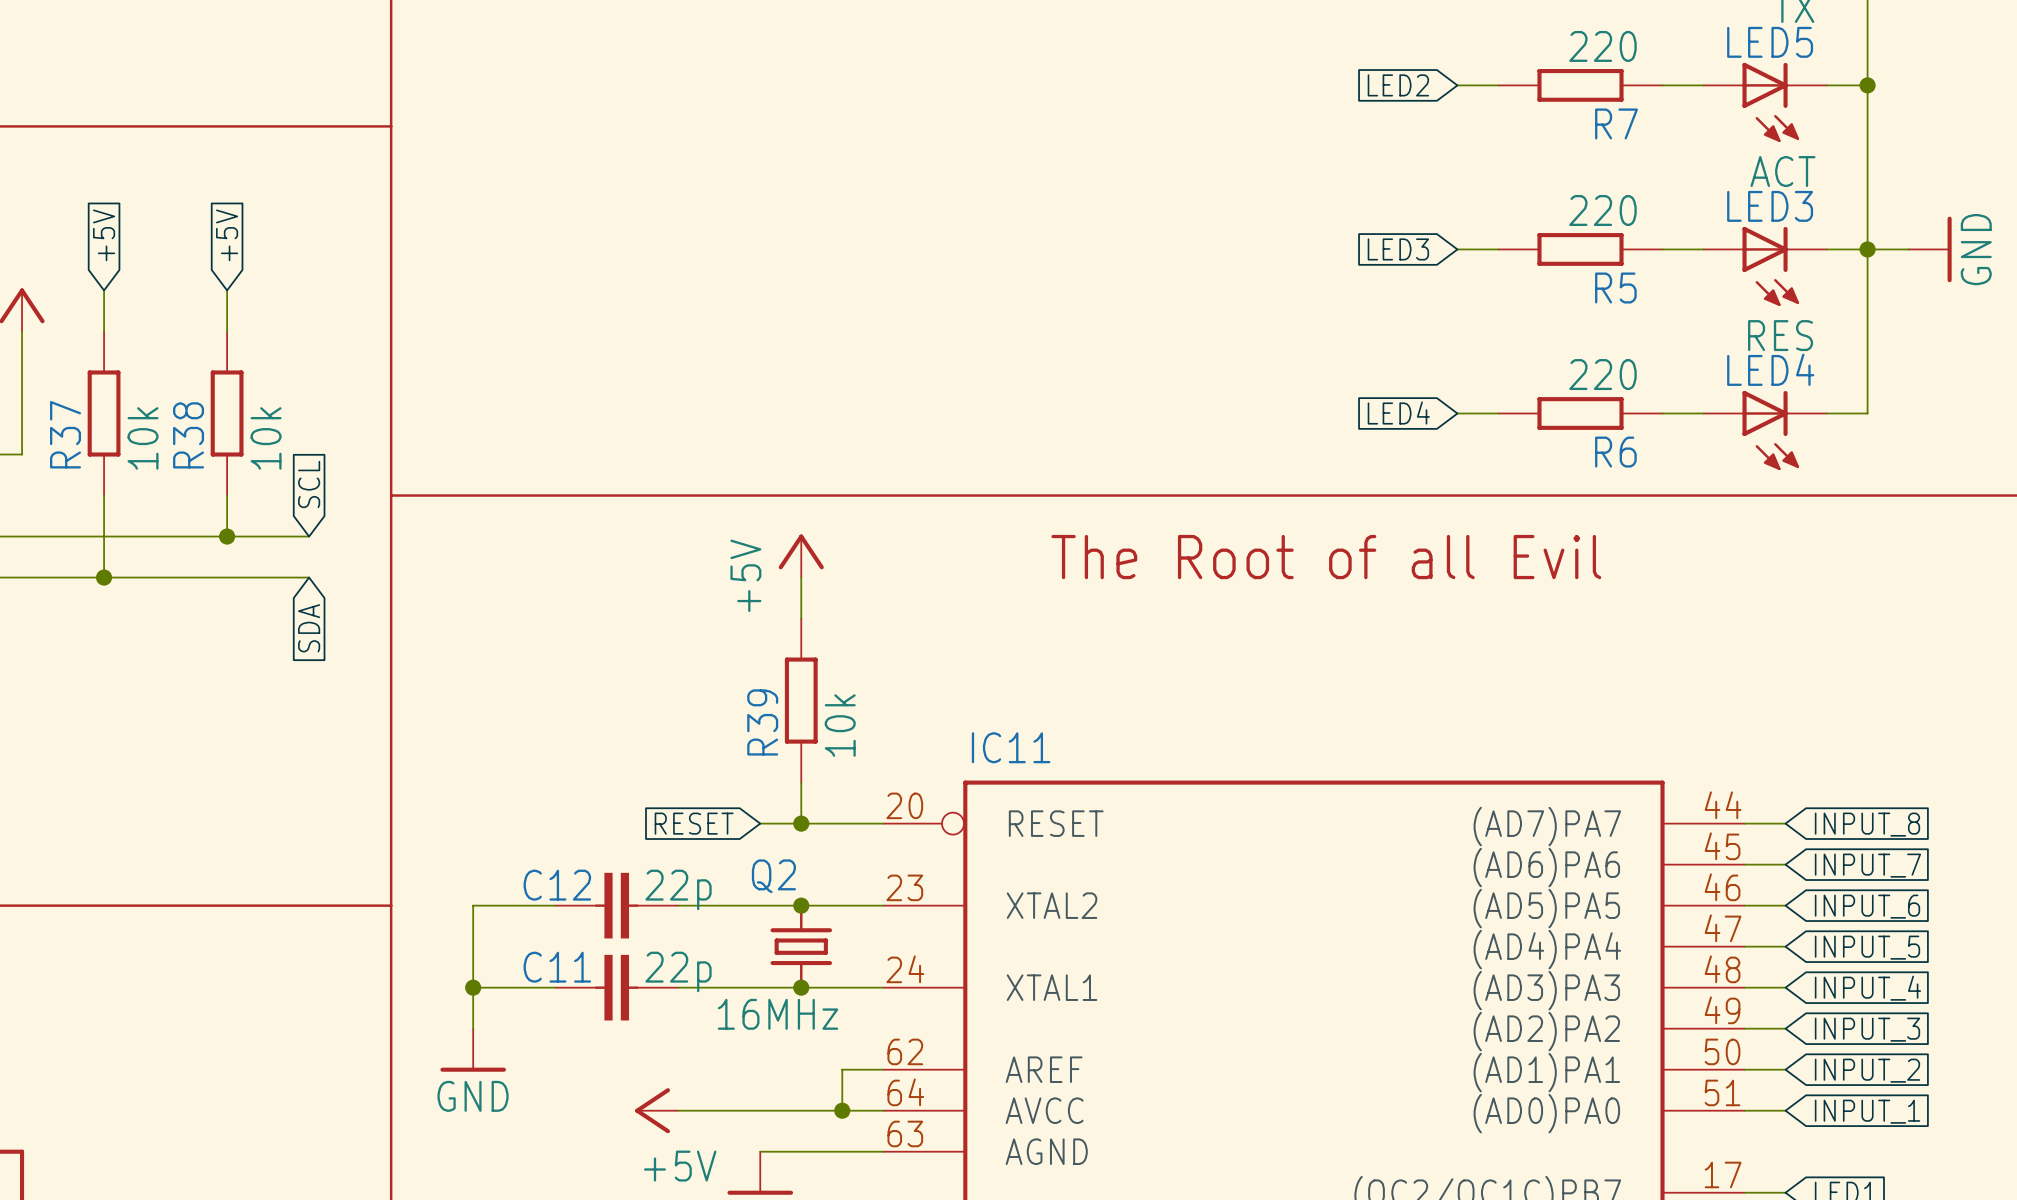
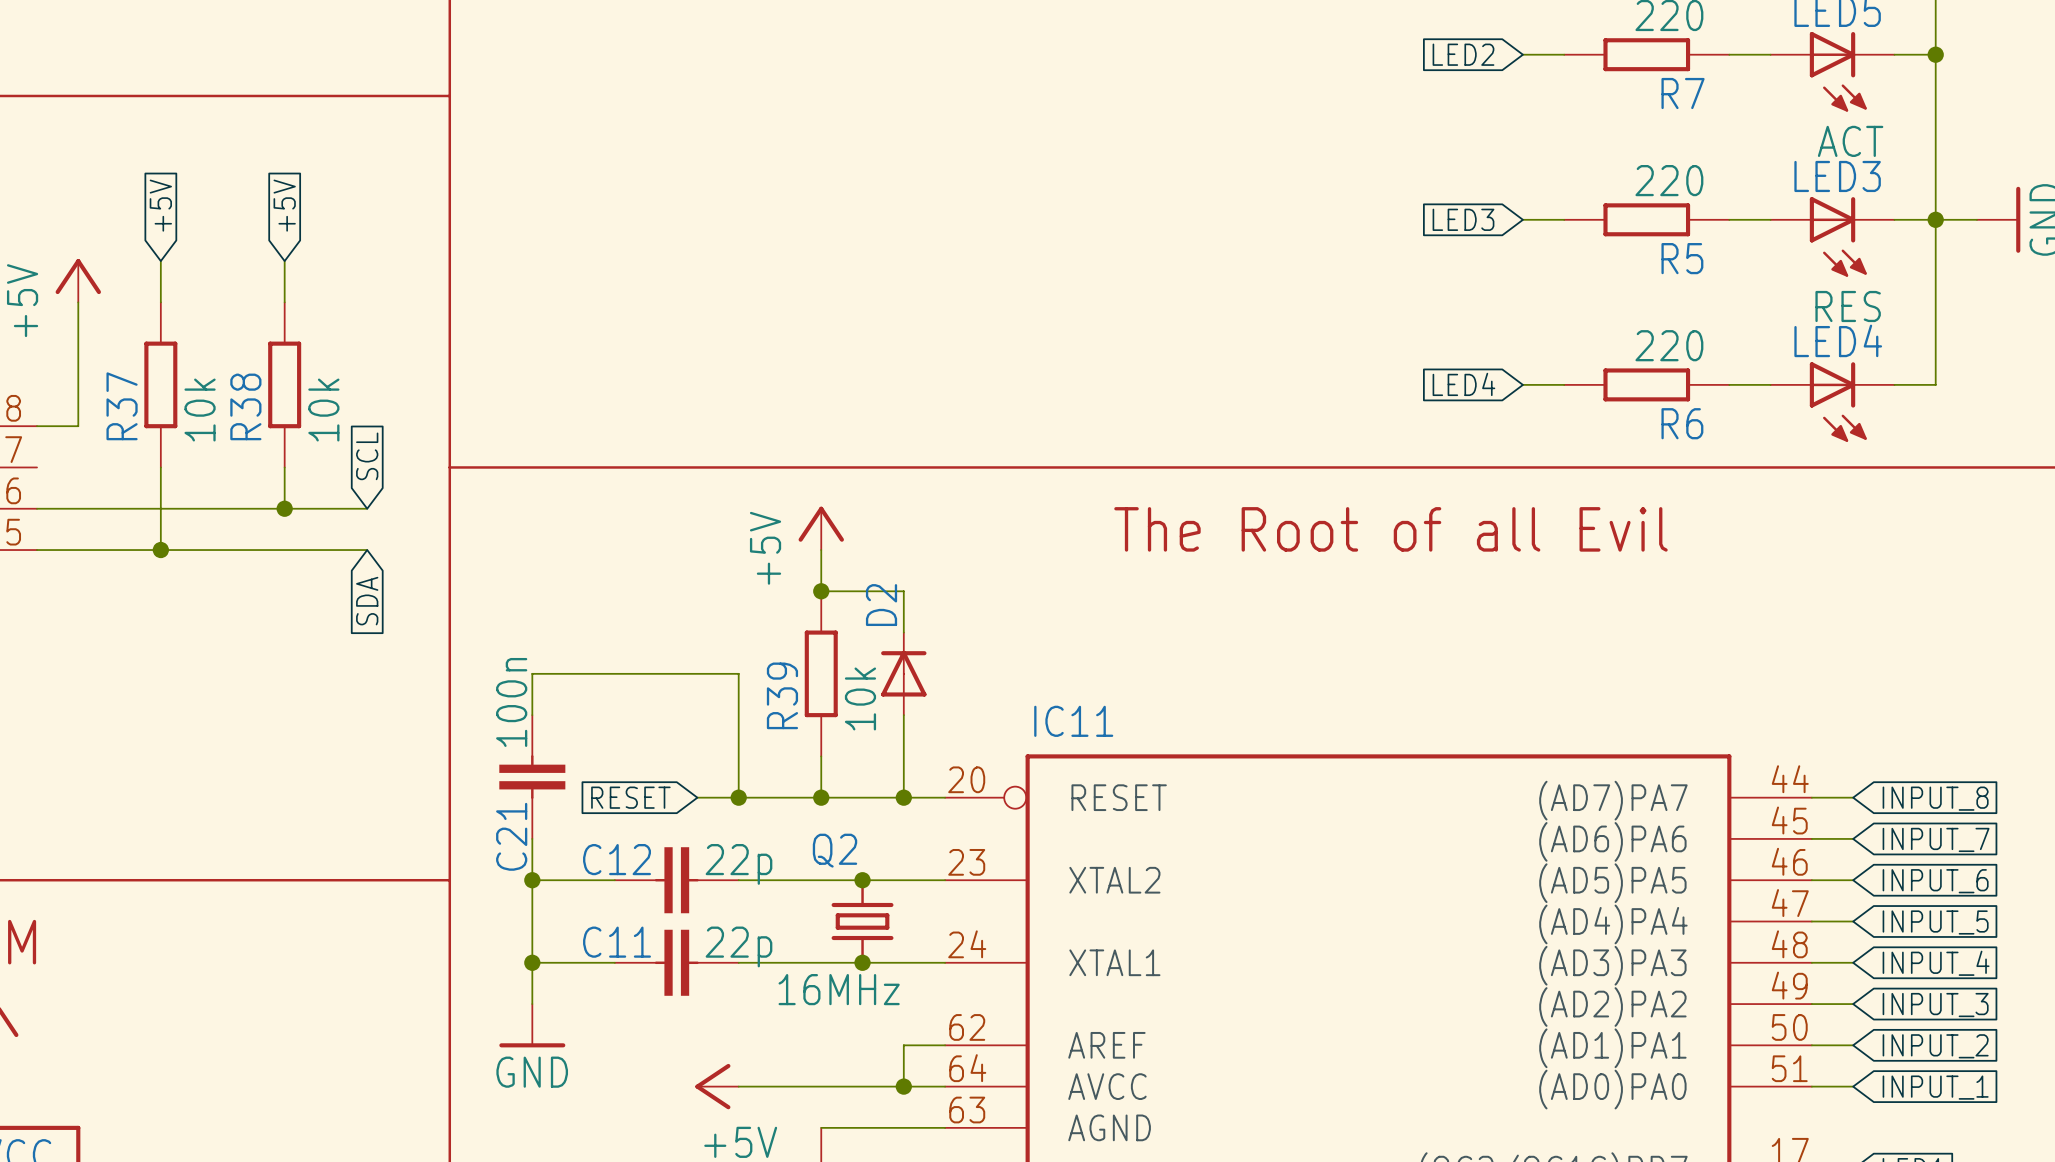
power symbol position: +5V (801, 556) -> +5V (821, 528)
wire: none -> (821, 550) (821, 591) (903, 591) (903, 632)
wire: (801, 577) (801, 618) -> none
junction: none -> (821, 591)
R39 position: (801, 700) -> (821, 673)
D2: none -> (903, 673)
wire: none -> (532, 715) (532, 673) (738, 673) (738, 797)
wire: none -> (903, 715) (903, 797)
wire: none -> (821, 756) (821, 797) (697, 797)
wire: (801, 782) (801, 823) -> (532, 838) (532, 880)
C21: none -> 100n (532, 777)
junction: none -> (738, 797)
global label position: RESET (694, 823) -> RESET (630, 797)
junction: none -> (821, 797)
junction: (801, 823) -> none
junction: none -> (903, 797)
junction: none -> (532, 880)

